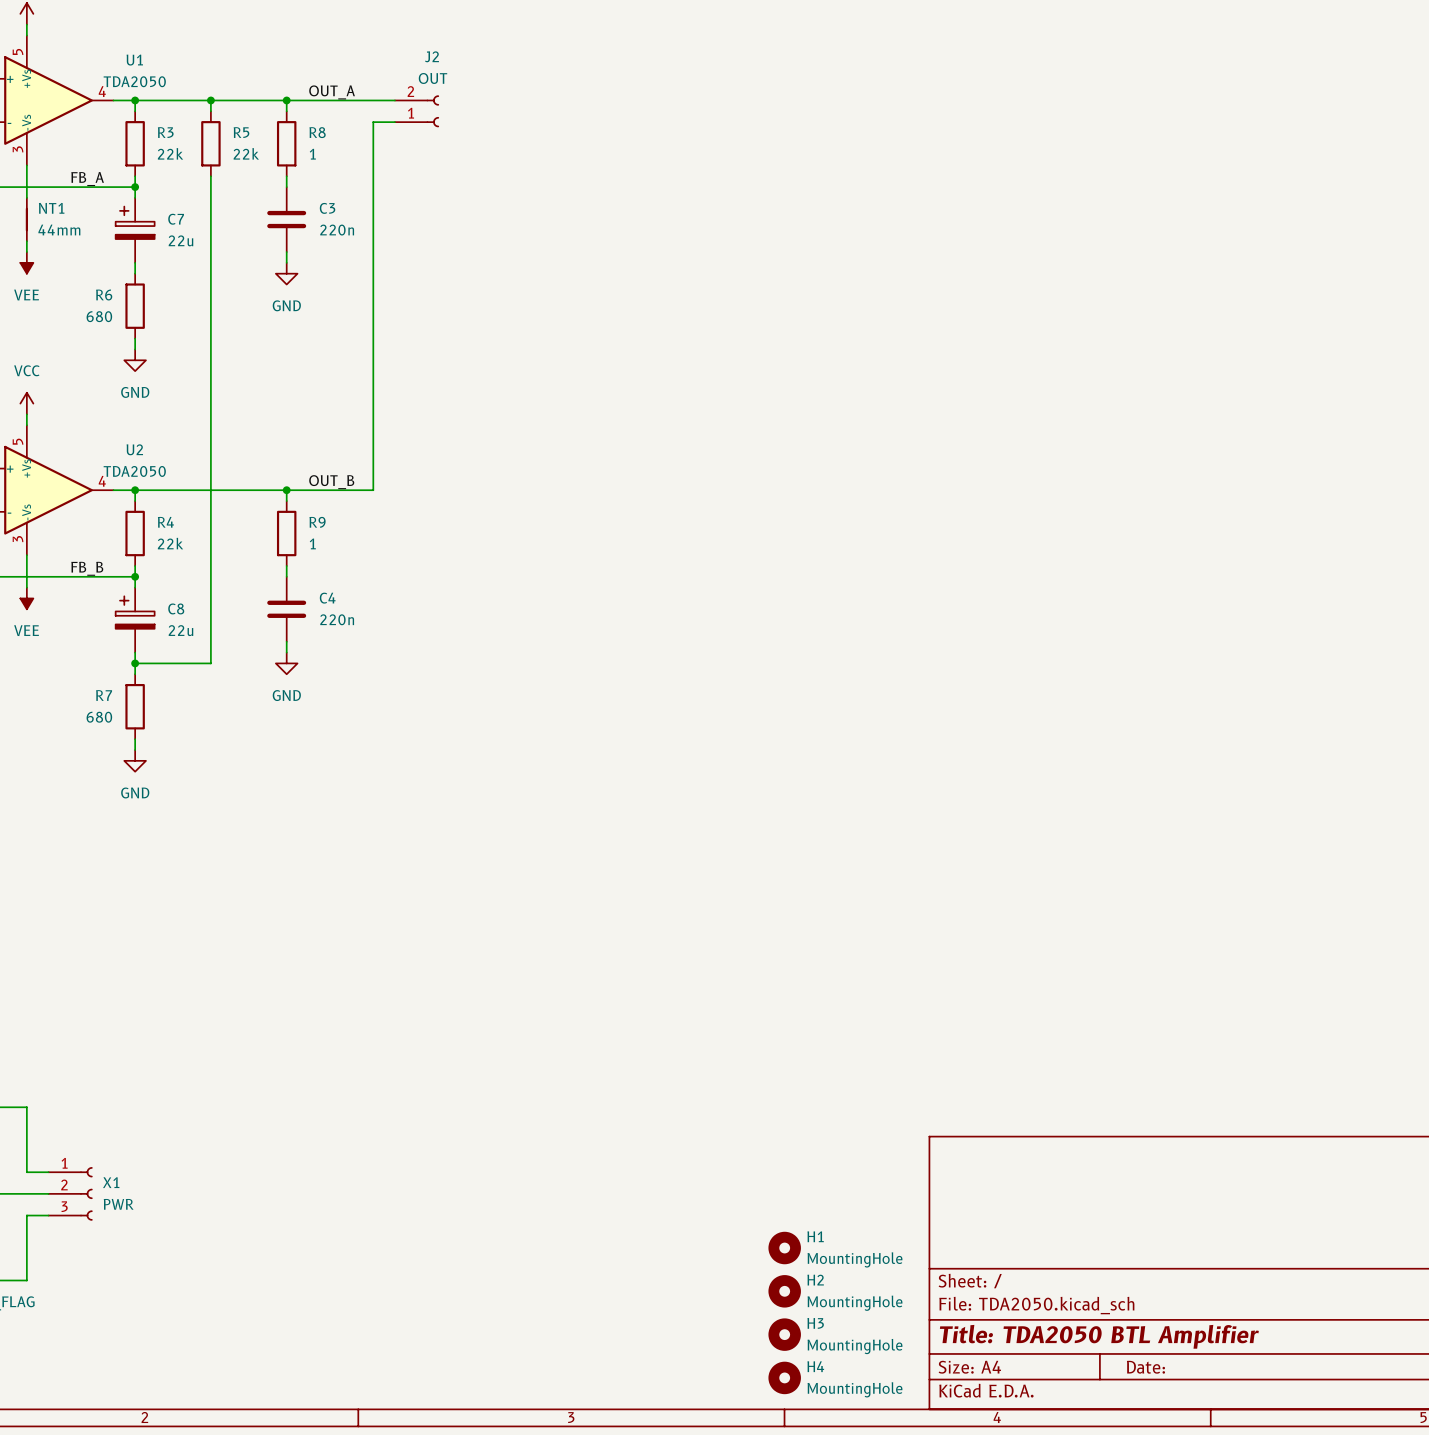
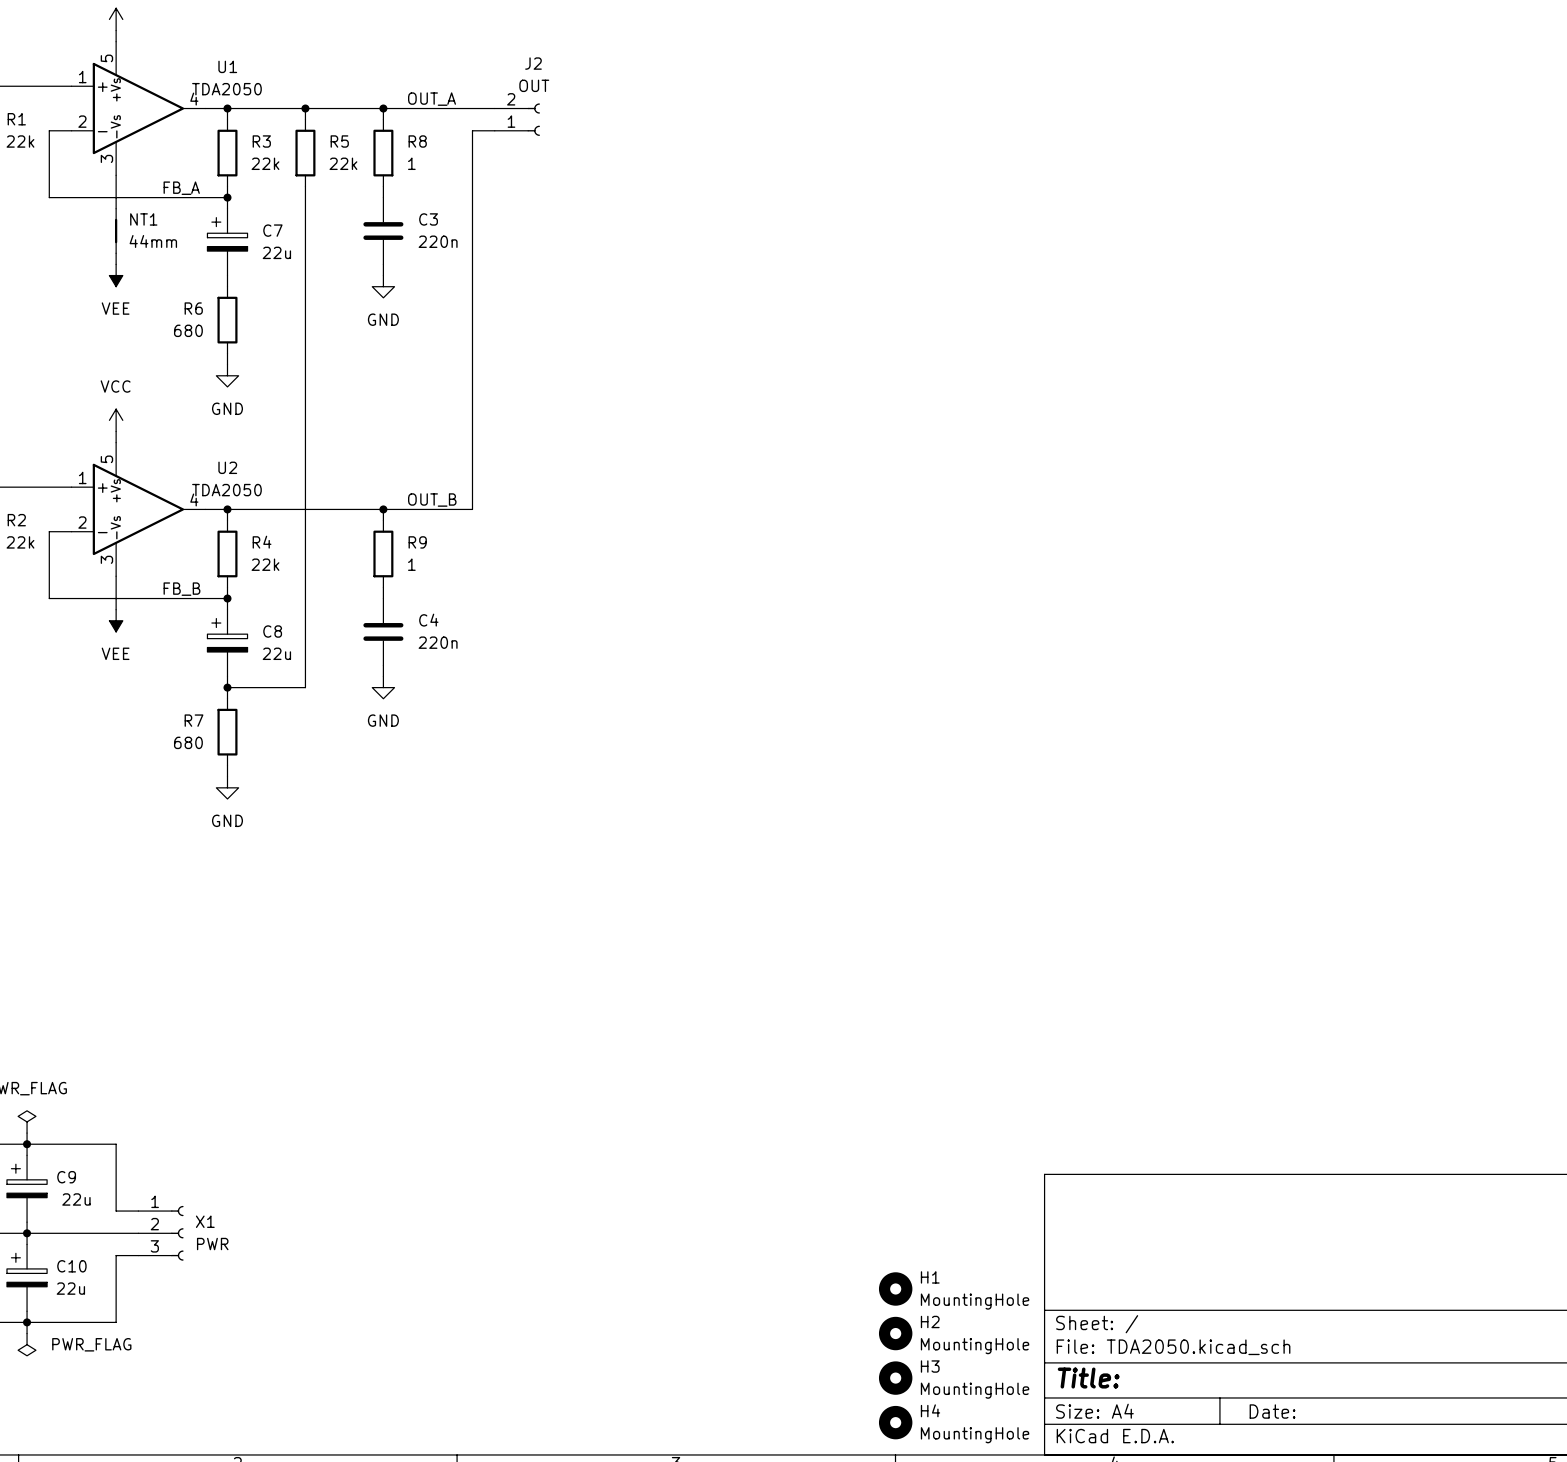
title block: Title: TDA2050 BTL Amplifier (1099, 1336) -> Title: (1088, 1378)

